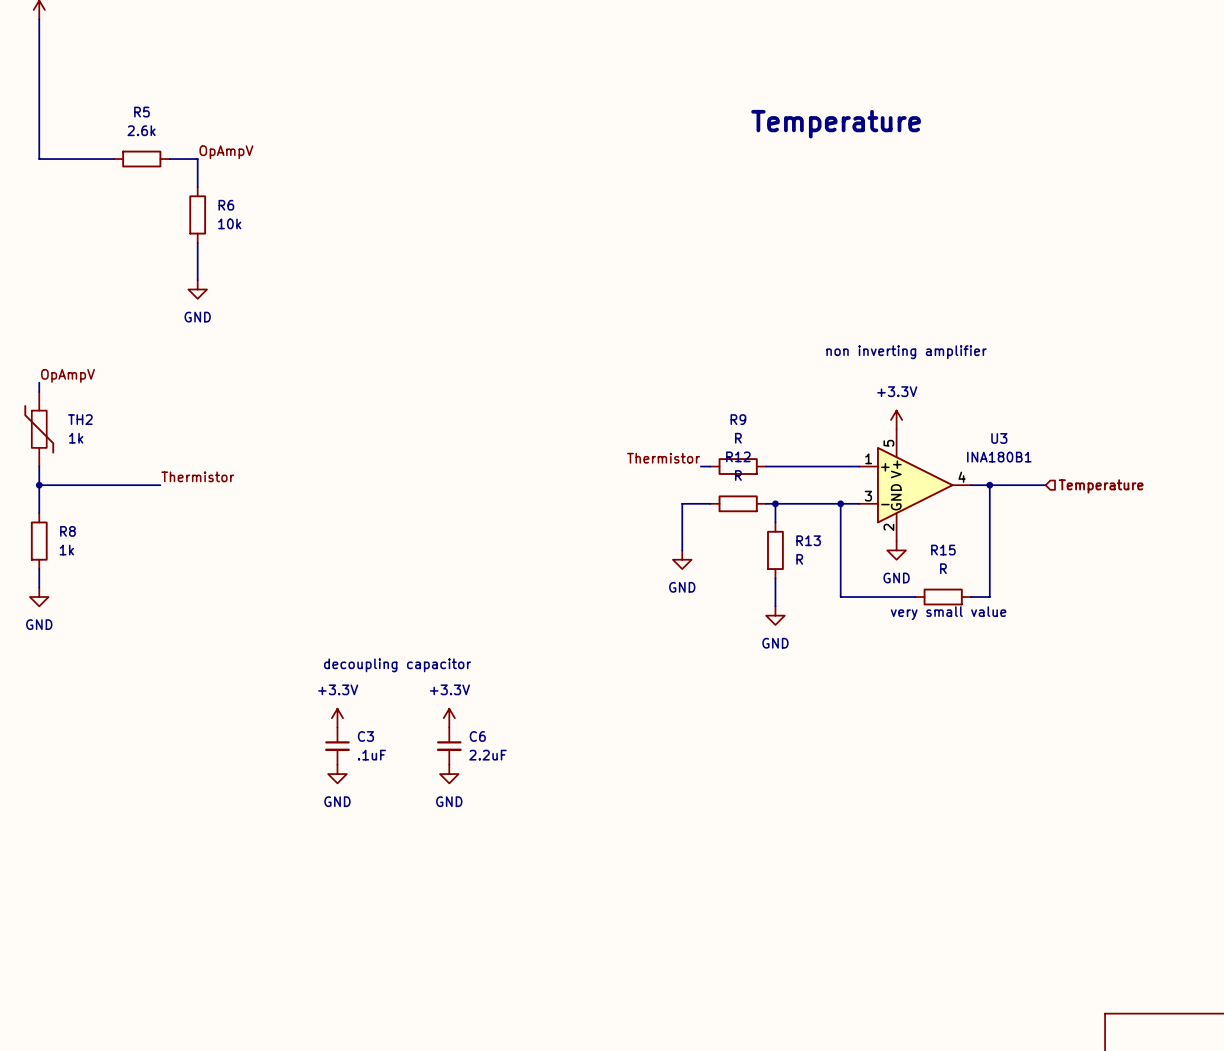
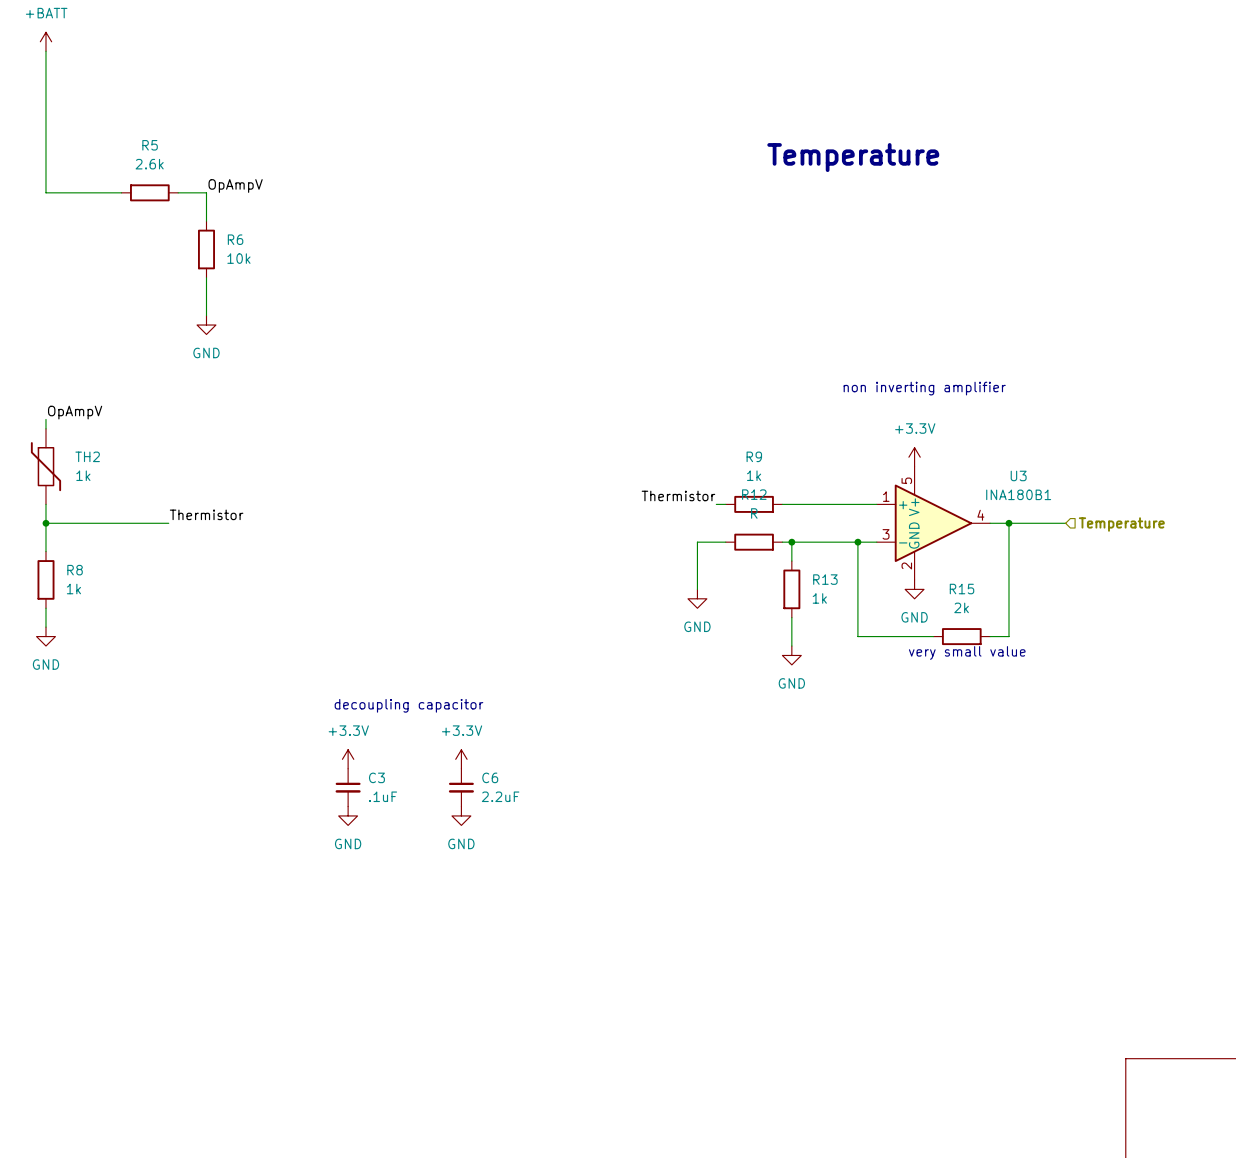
R9 value: R (738, 438) -> 1k (754, 475)
R13 value: R (799, 559) -> 1k (819, 598)
R15 value: R (943, 568) -> 2k (961, 607)

